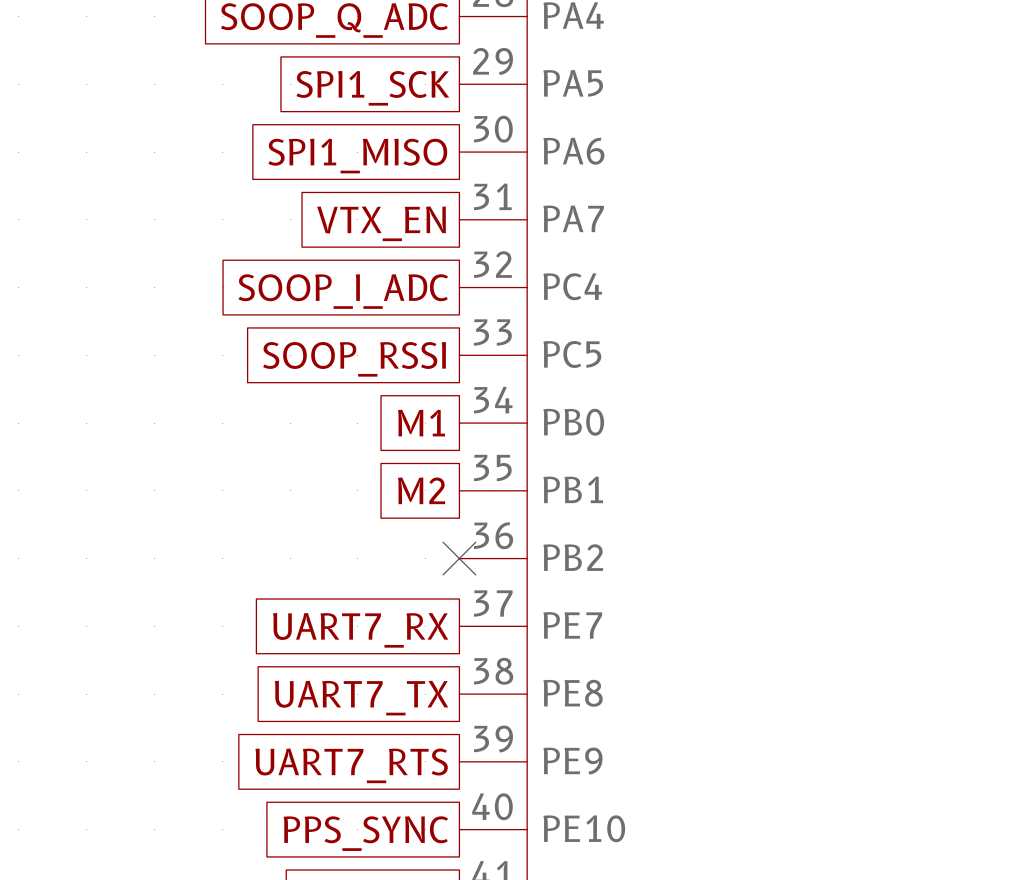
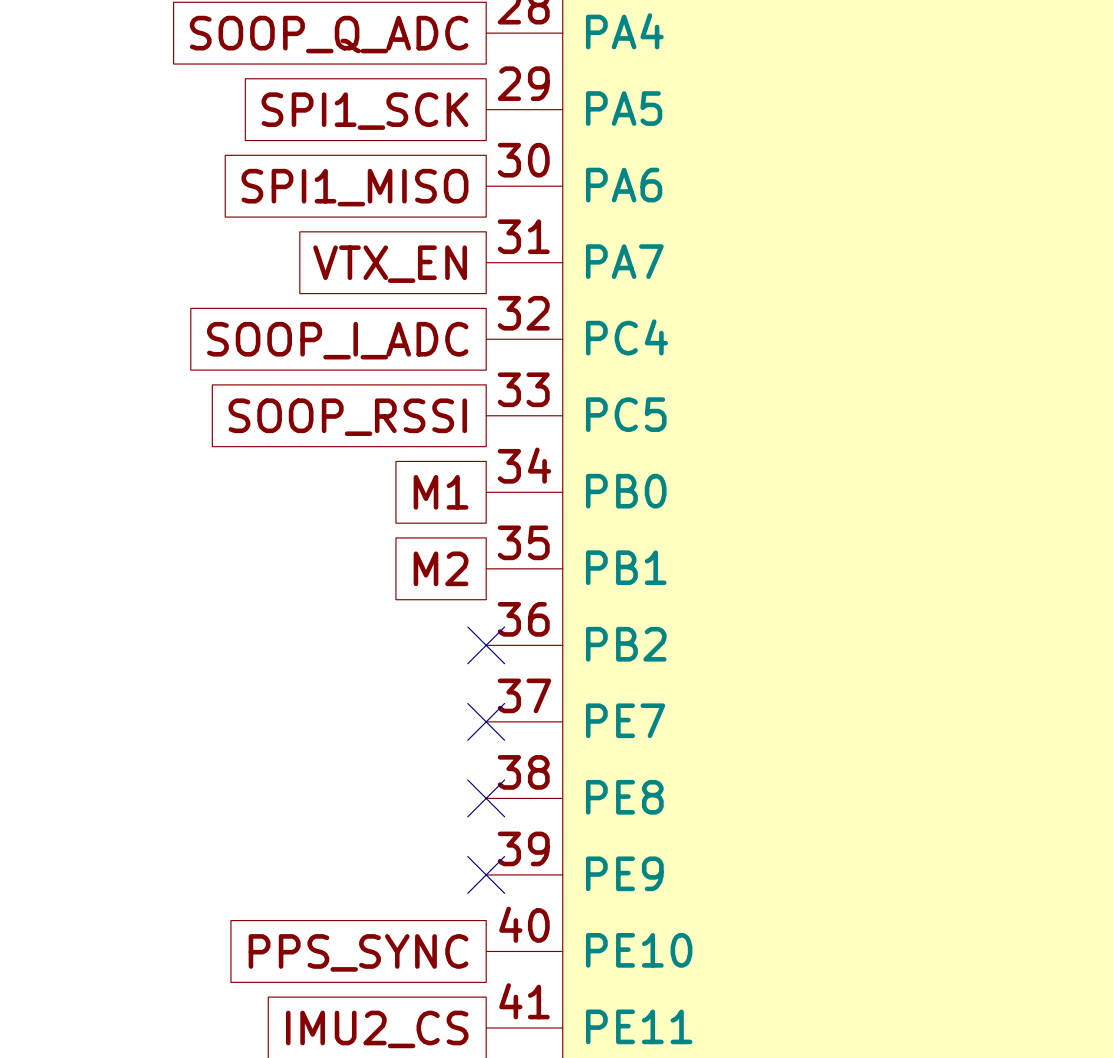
no-connect mark: none -> (486, 721)
global label: UART7_RX (360, 630) -> none
no-connect mark: none -> (486, 798)
global label: UART7_TX (361, 698) -> none
no-connect mark: none -> (486, 874)
global label: UART7_RTS (351, 765) -> none

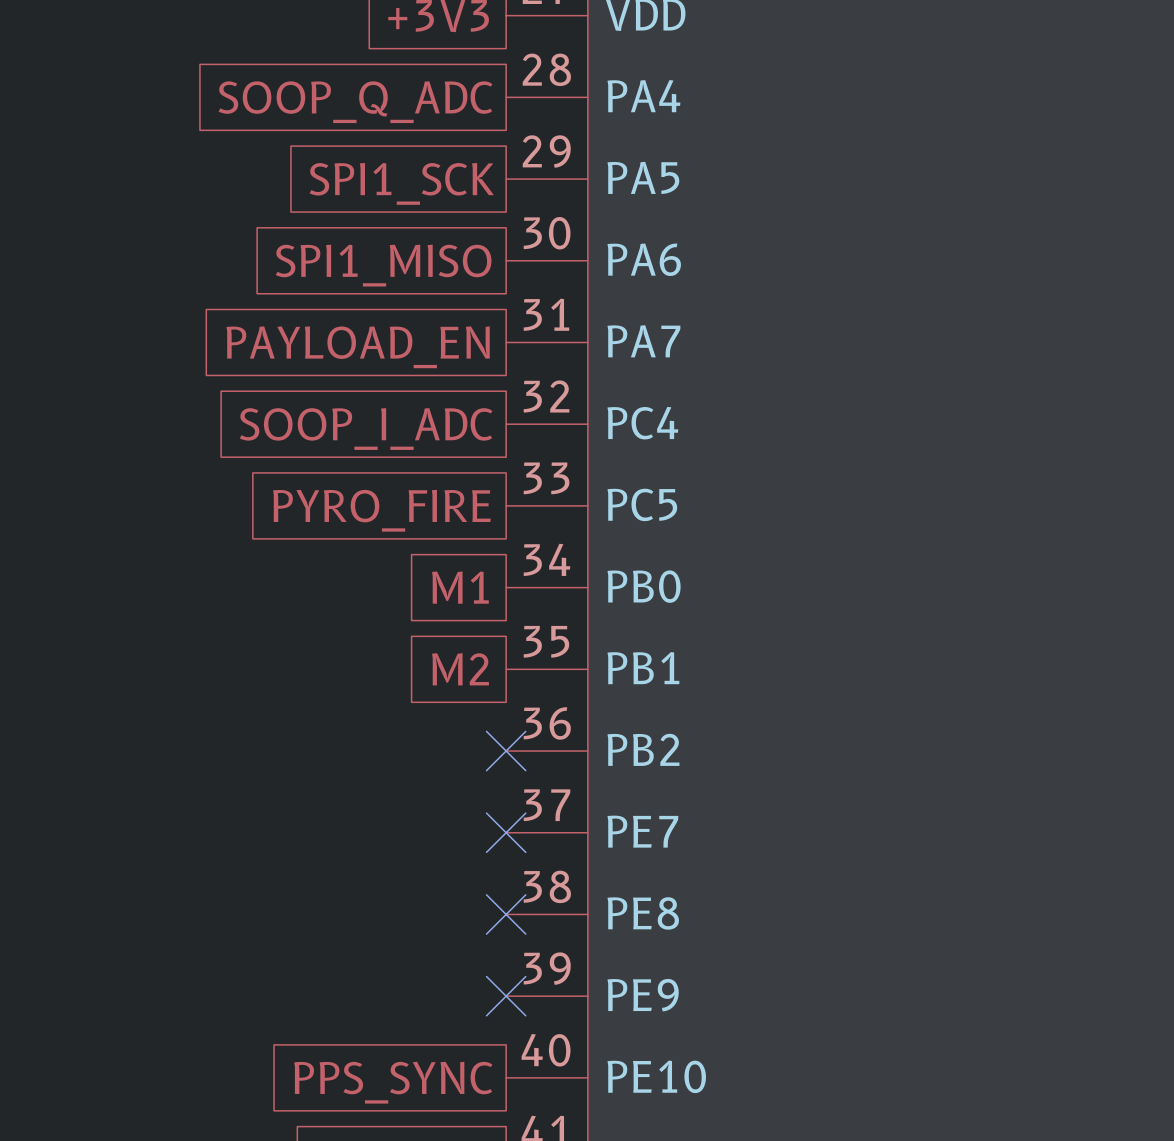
global label: VTX_EN (390, 264) -> PAYLOAD_EN (358, 347)
global label: SOOP_RSSI (347, 417) -> PYRO_FIRE (381, 510)

